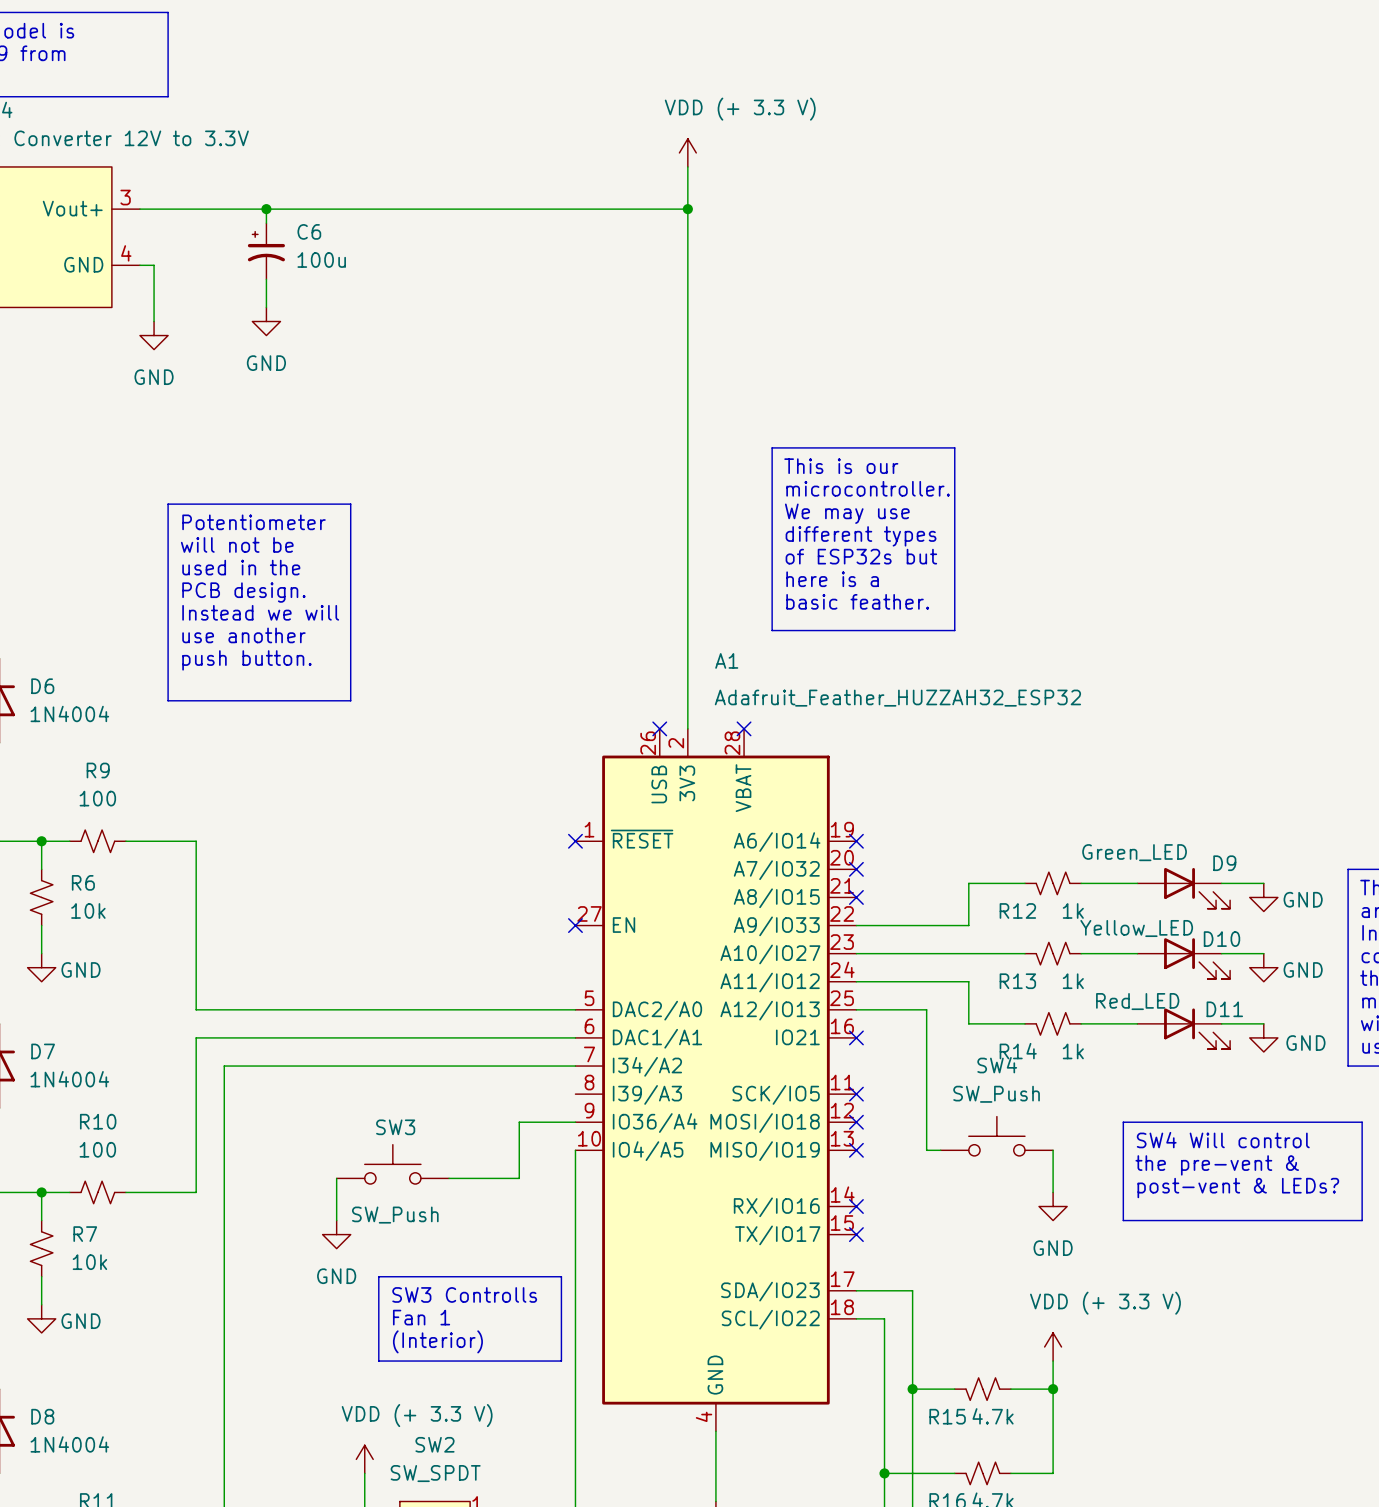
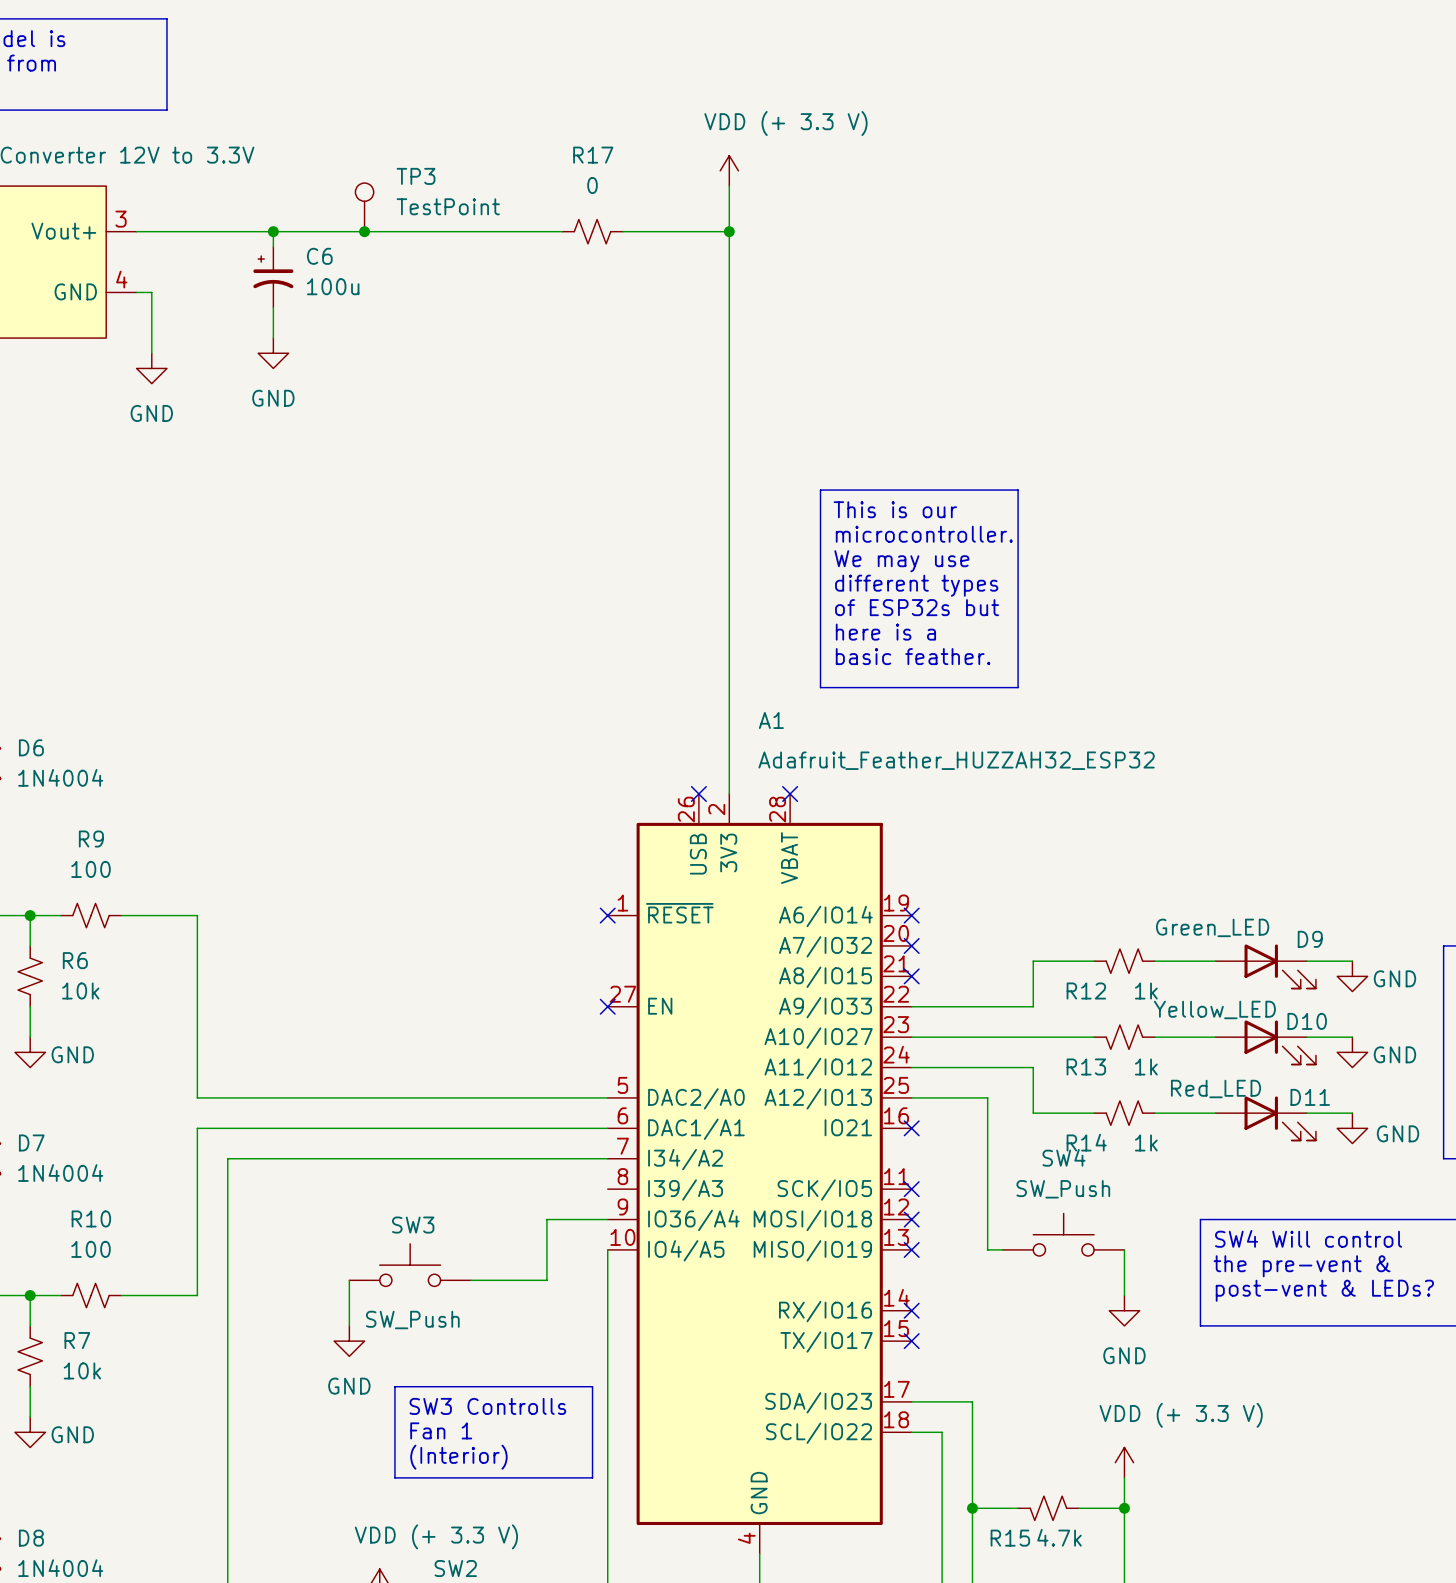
TP3: none -> TestPoint (364, 207)
junction: none -> (364, 231)
R17: none -> 0 (592, 231)
line: (168, 504) (350, 504) (350, 700) (168, 700) (168, 504) -> none
text: Potentiometer (253, 522) -> none
text: will not be (237, 544) -> none
text: used in the (241, 567) -> none
text: PCB design. (243, 592) -> none
text: Instead we will (260, 612) -> none
text: use another (243, 635) -> none
text: push button. (246, 660) -> none

